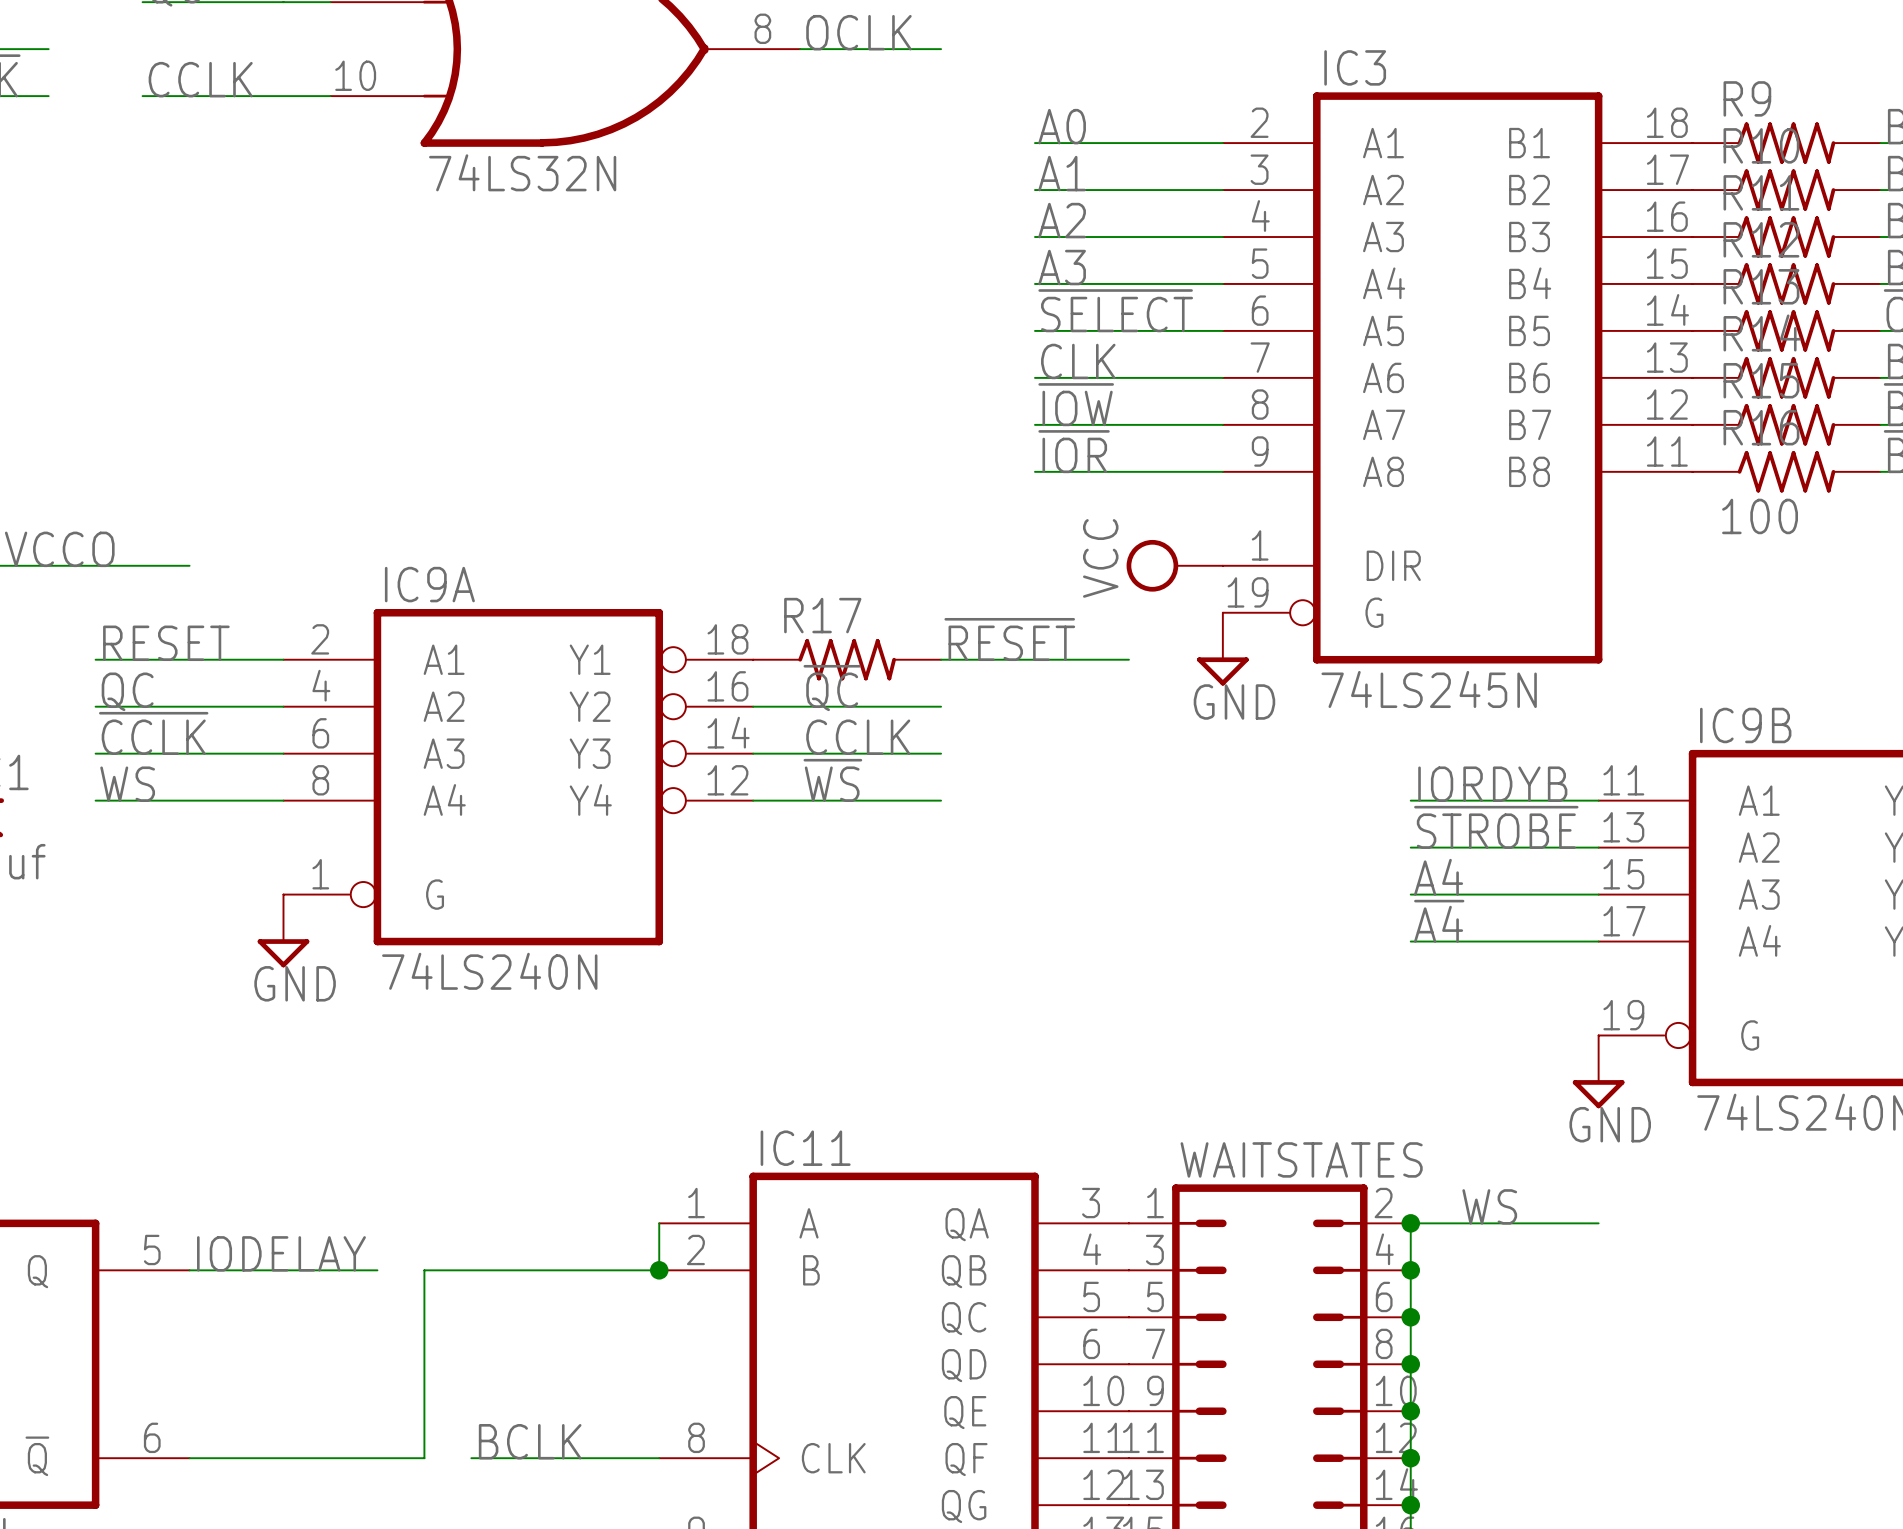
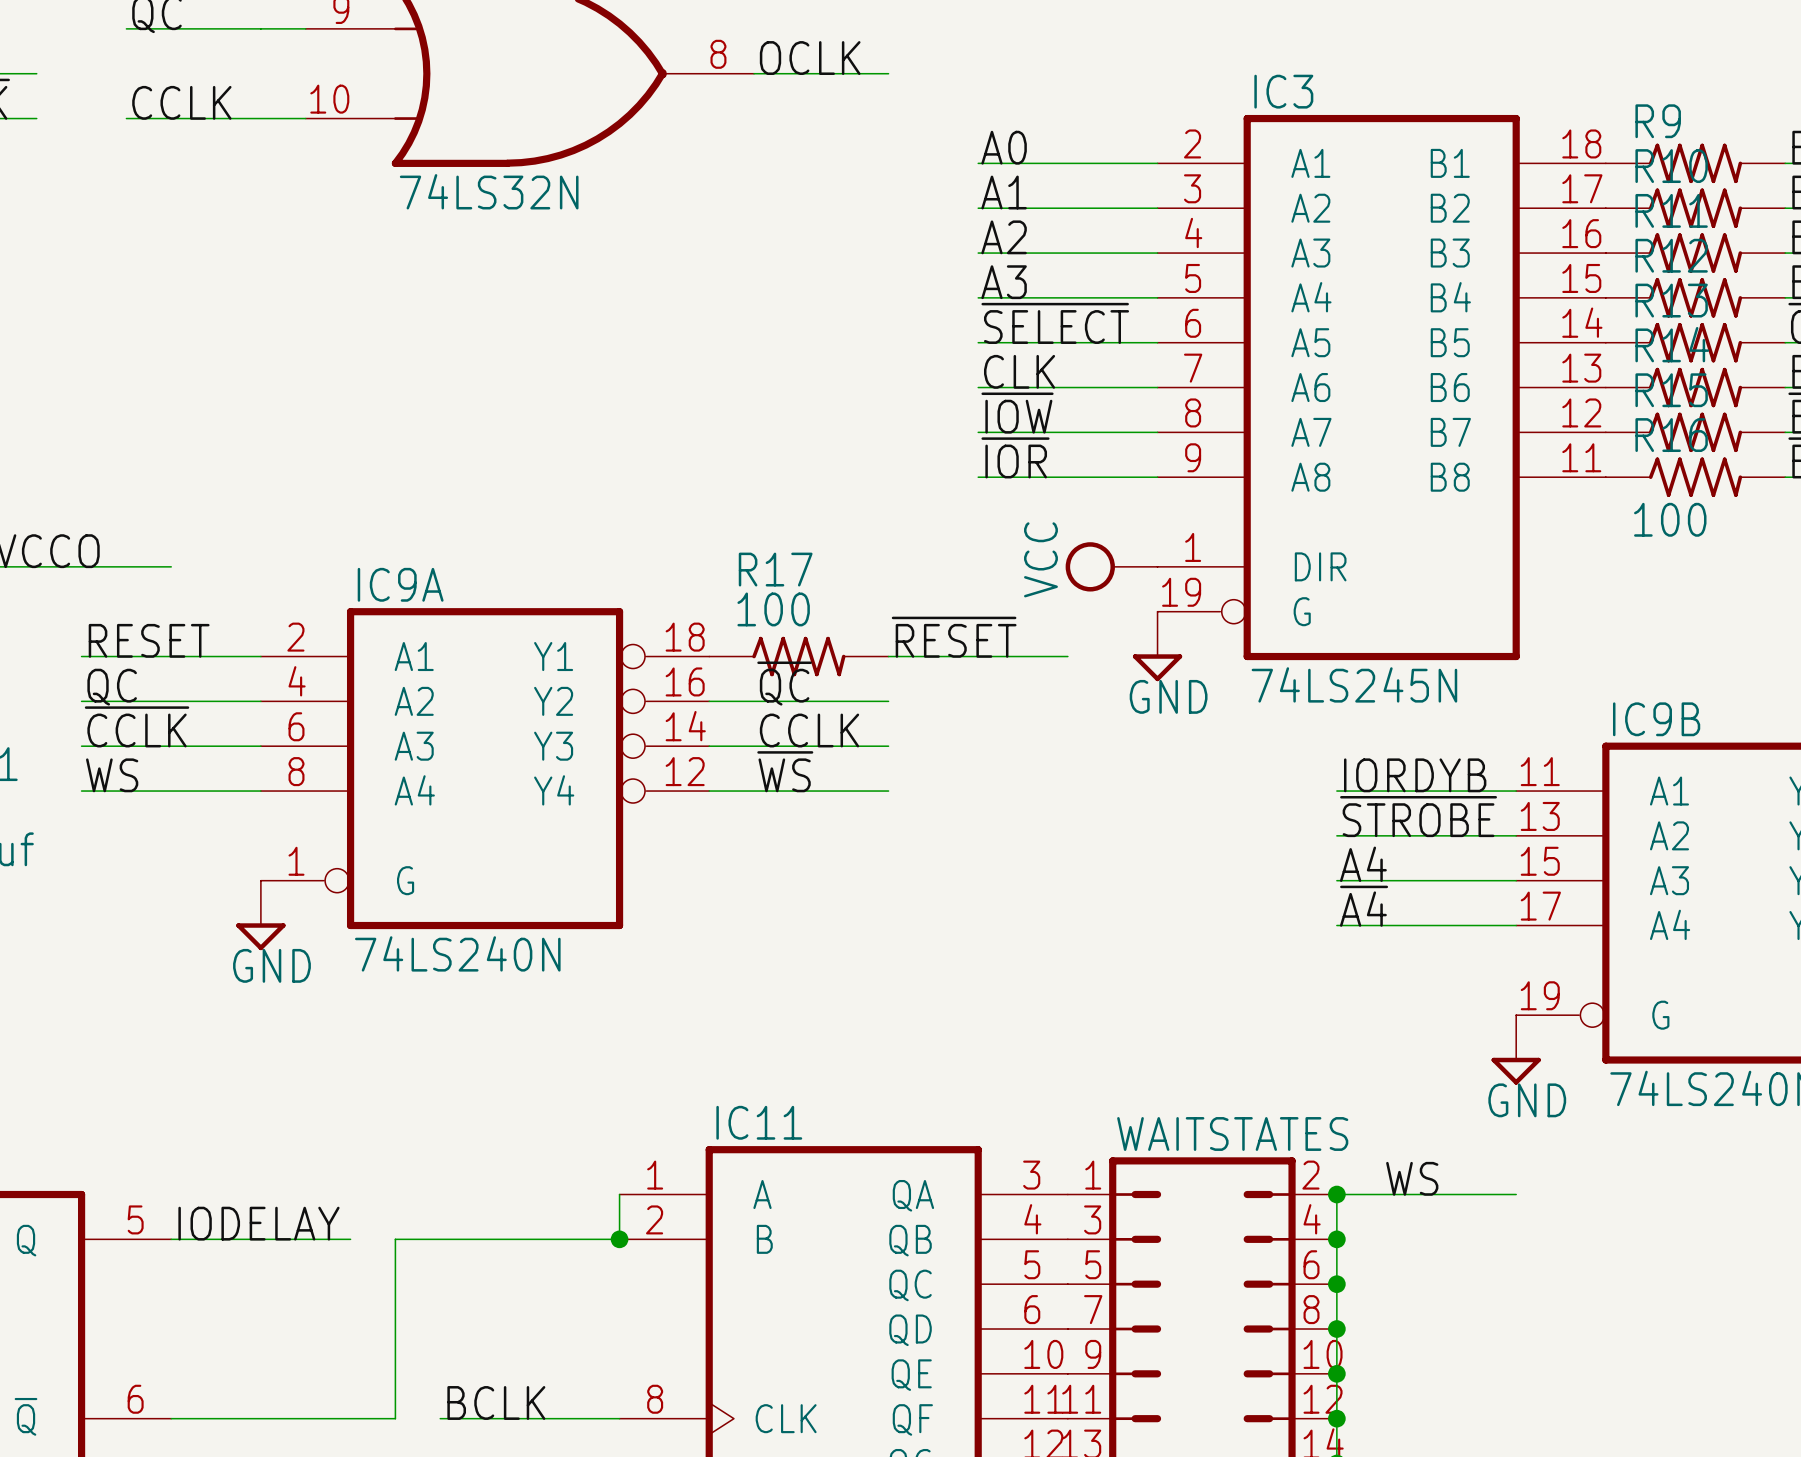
R17 value: none -> 100 (773, 609)
R17 name position: R17 (822, 615) -> R17 (775, 569)

